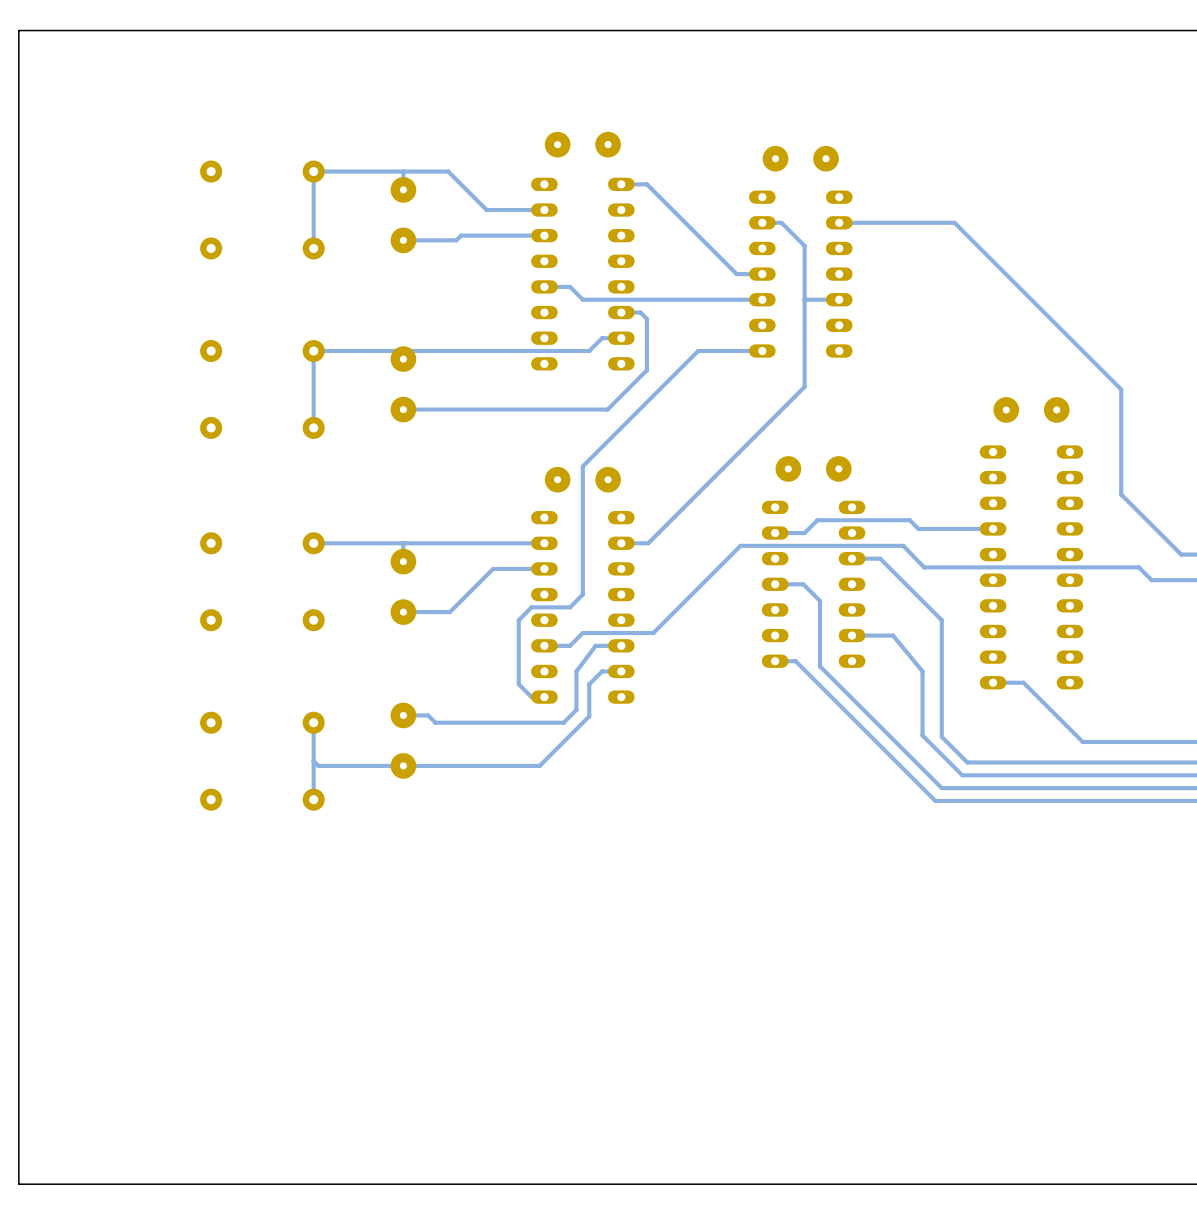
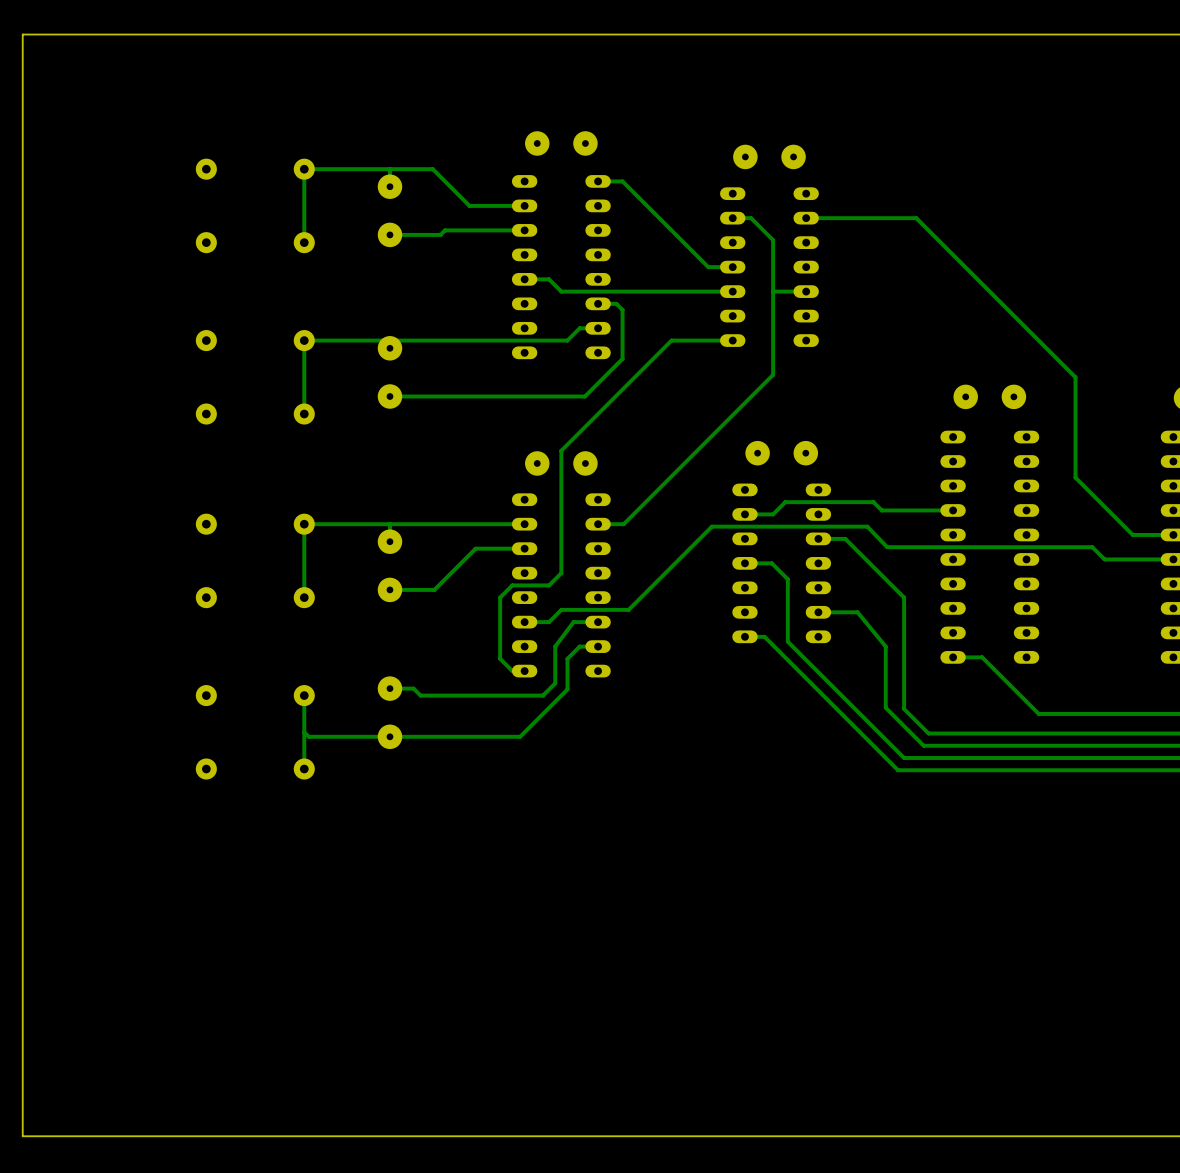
track: none -> (304, 524) (304, 597)

